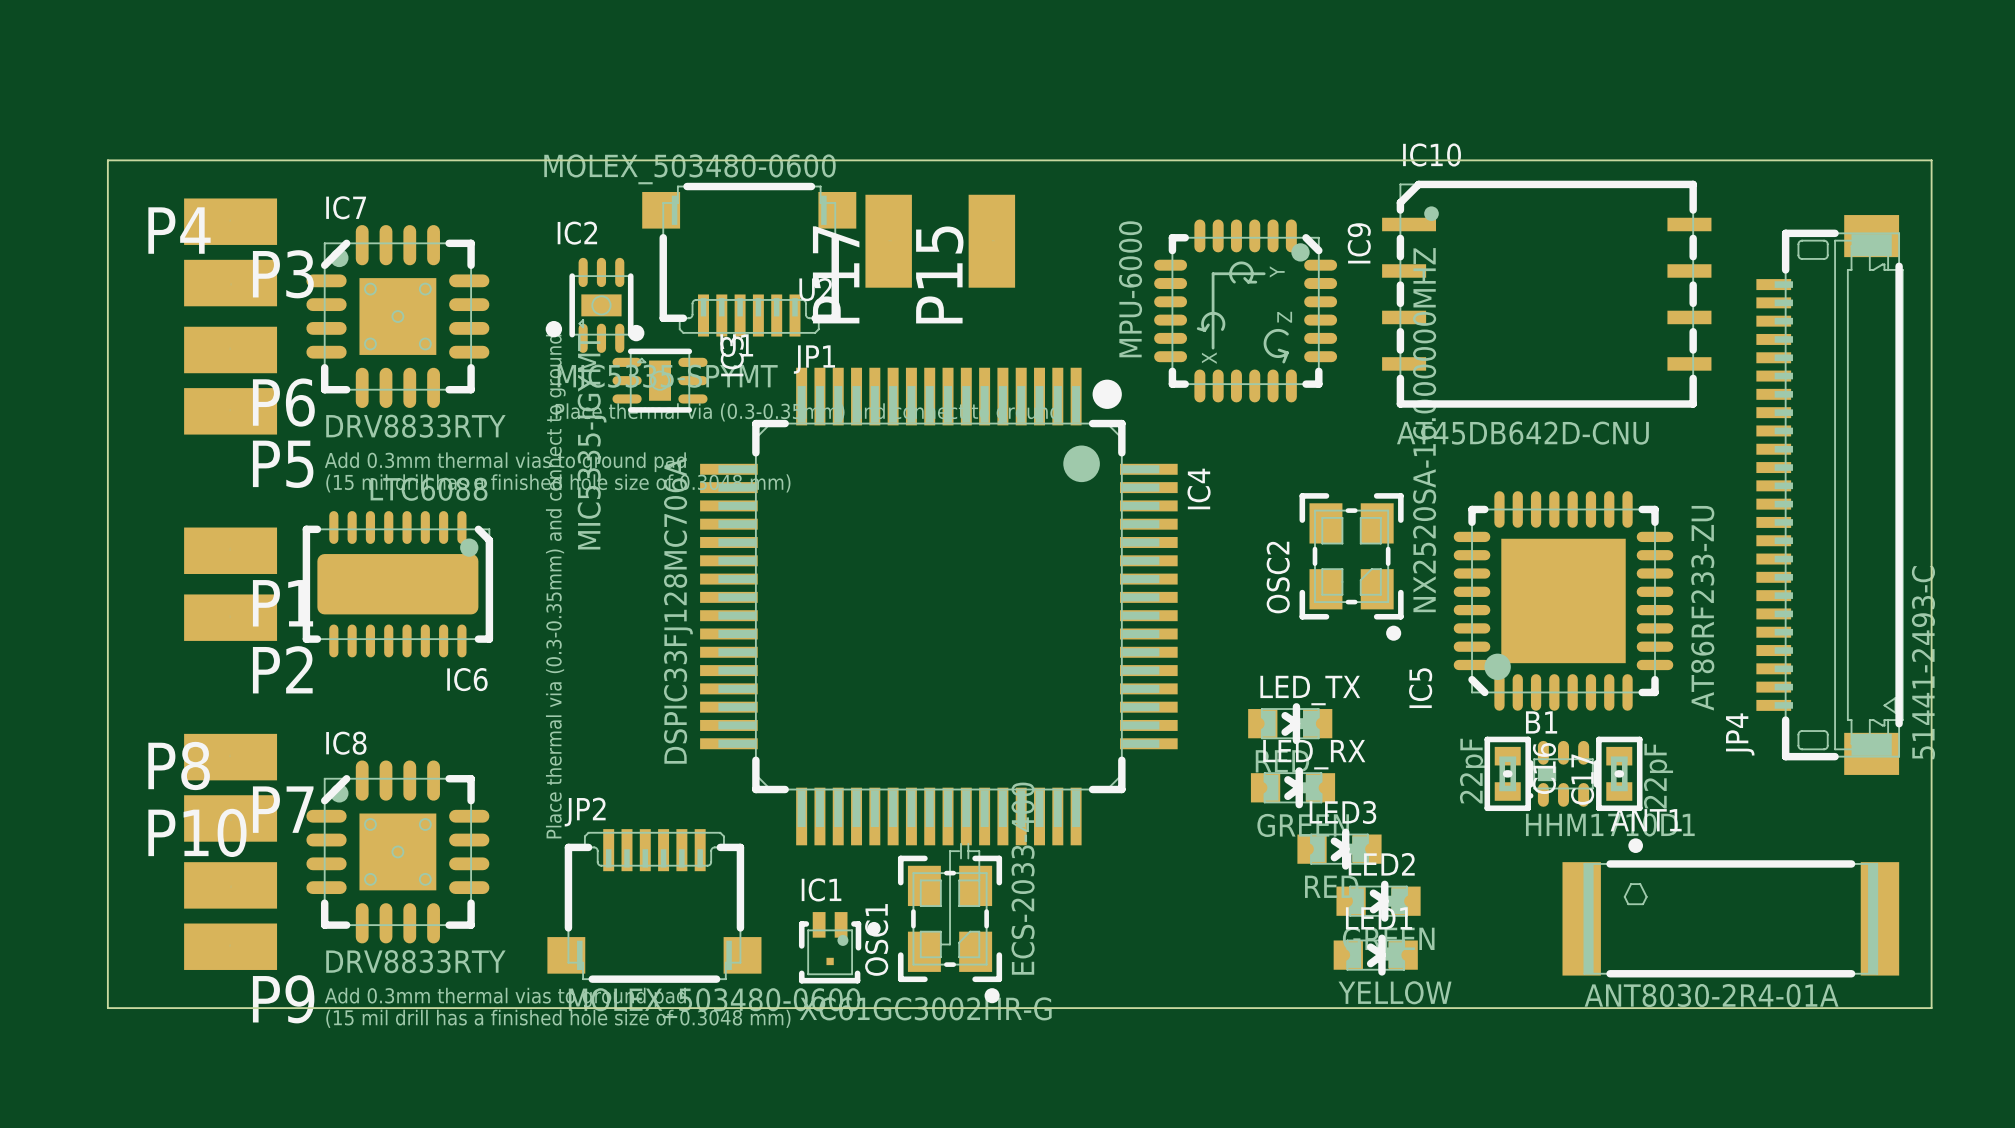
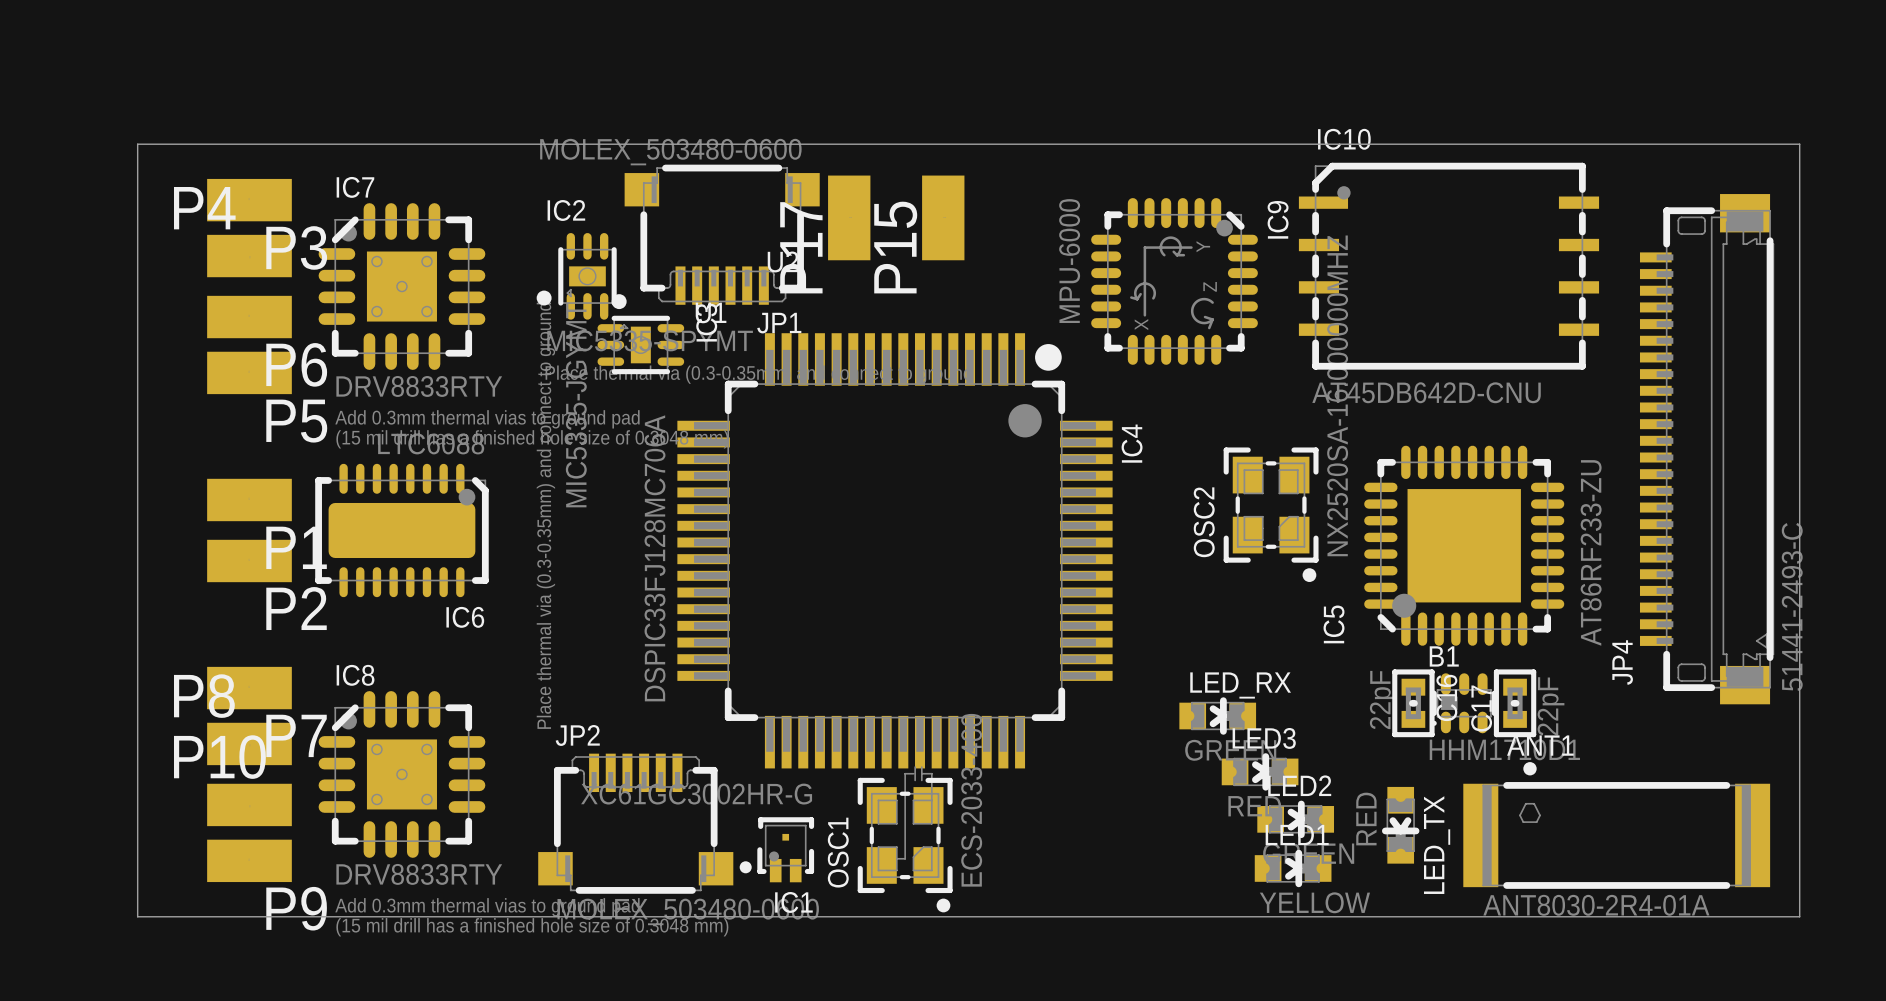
LED_TX rotation: 0° (1290, 723) -> 90° clockwise (1400, 825)
LED_TX position: (1290, 723) -> (1400, 825)
IC1 rotation: 0° (839, 947) -> 180° (776, 849)

